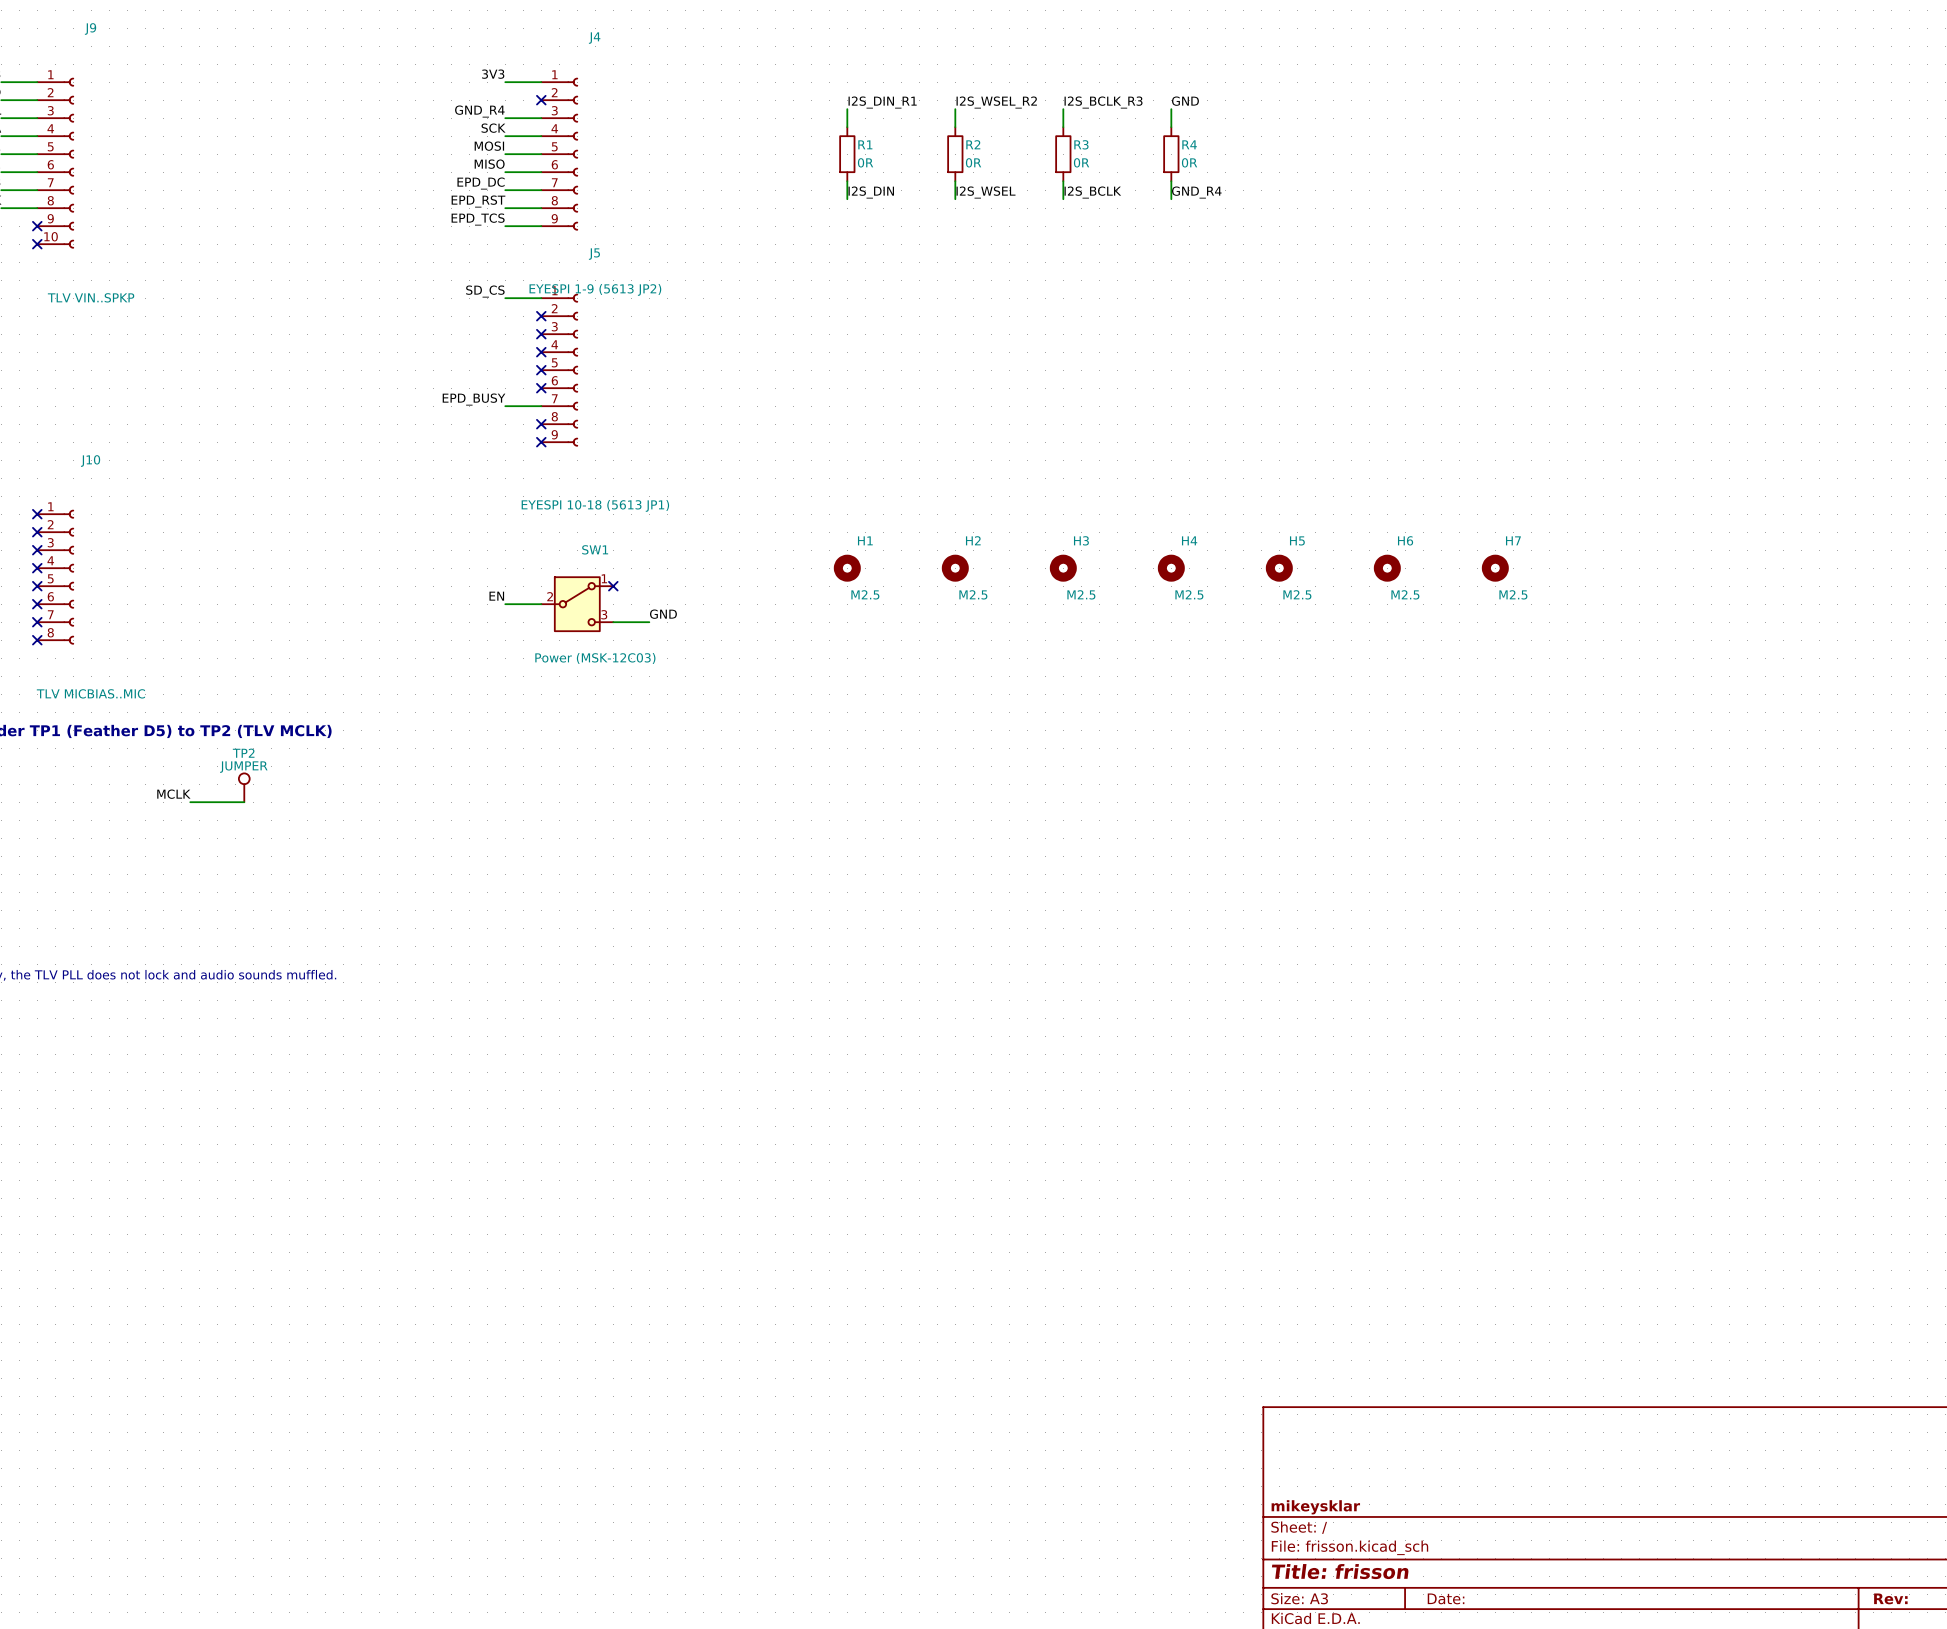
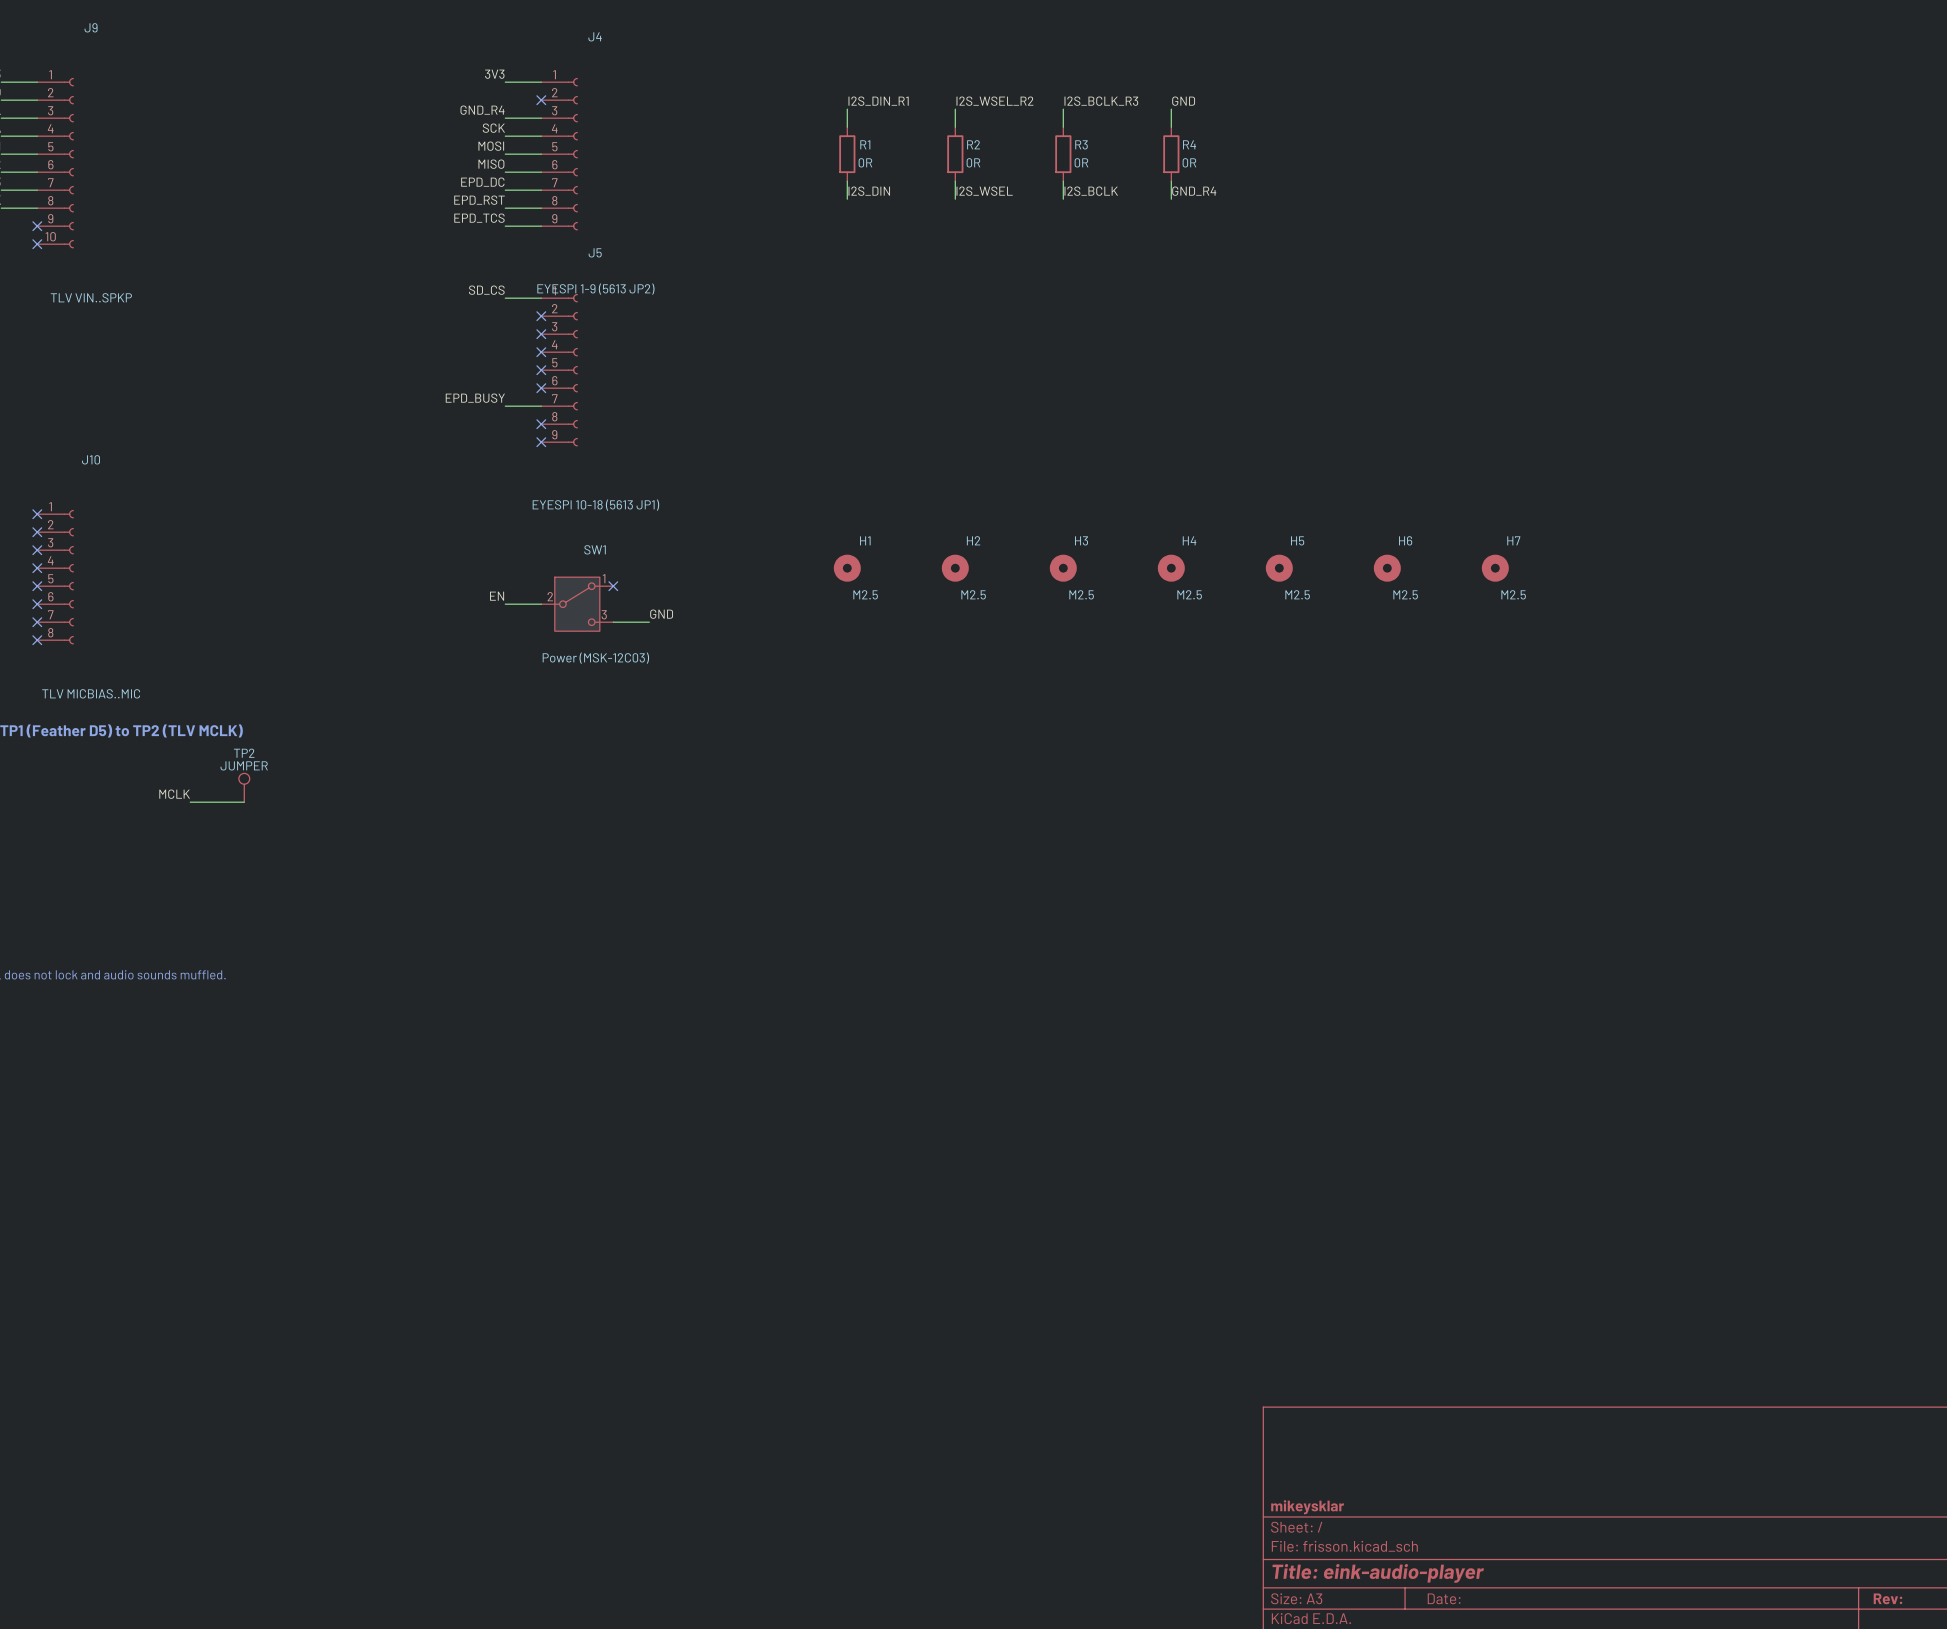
title block: Title: frisson (1340, 1571) -> Title: eink-audio-player (1378, 1573)

